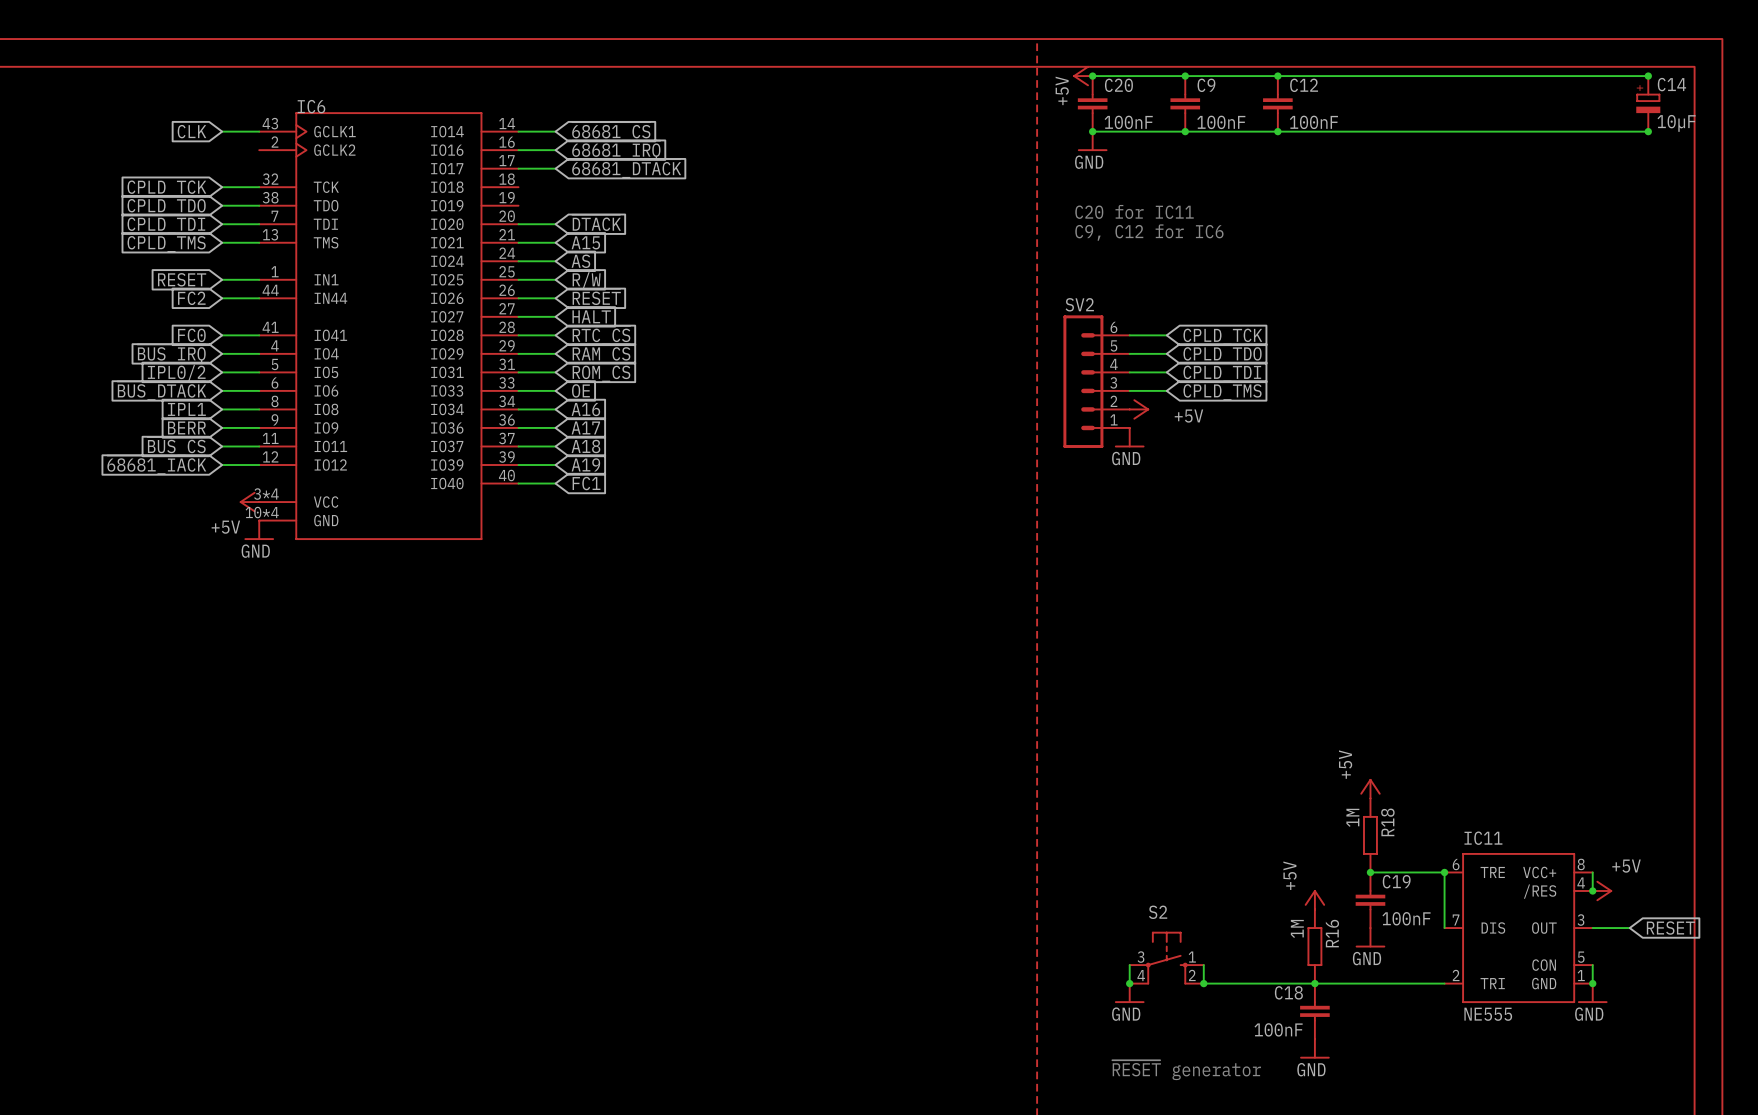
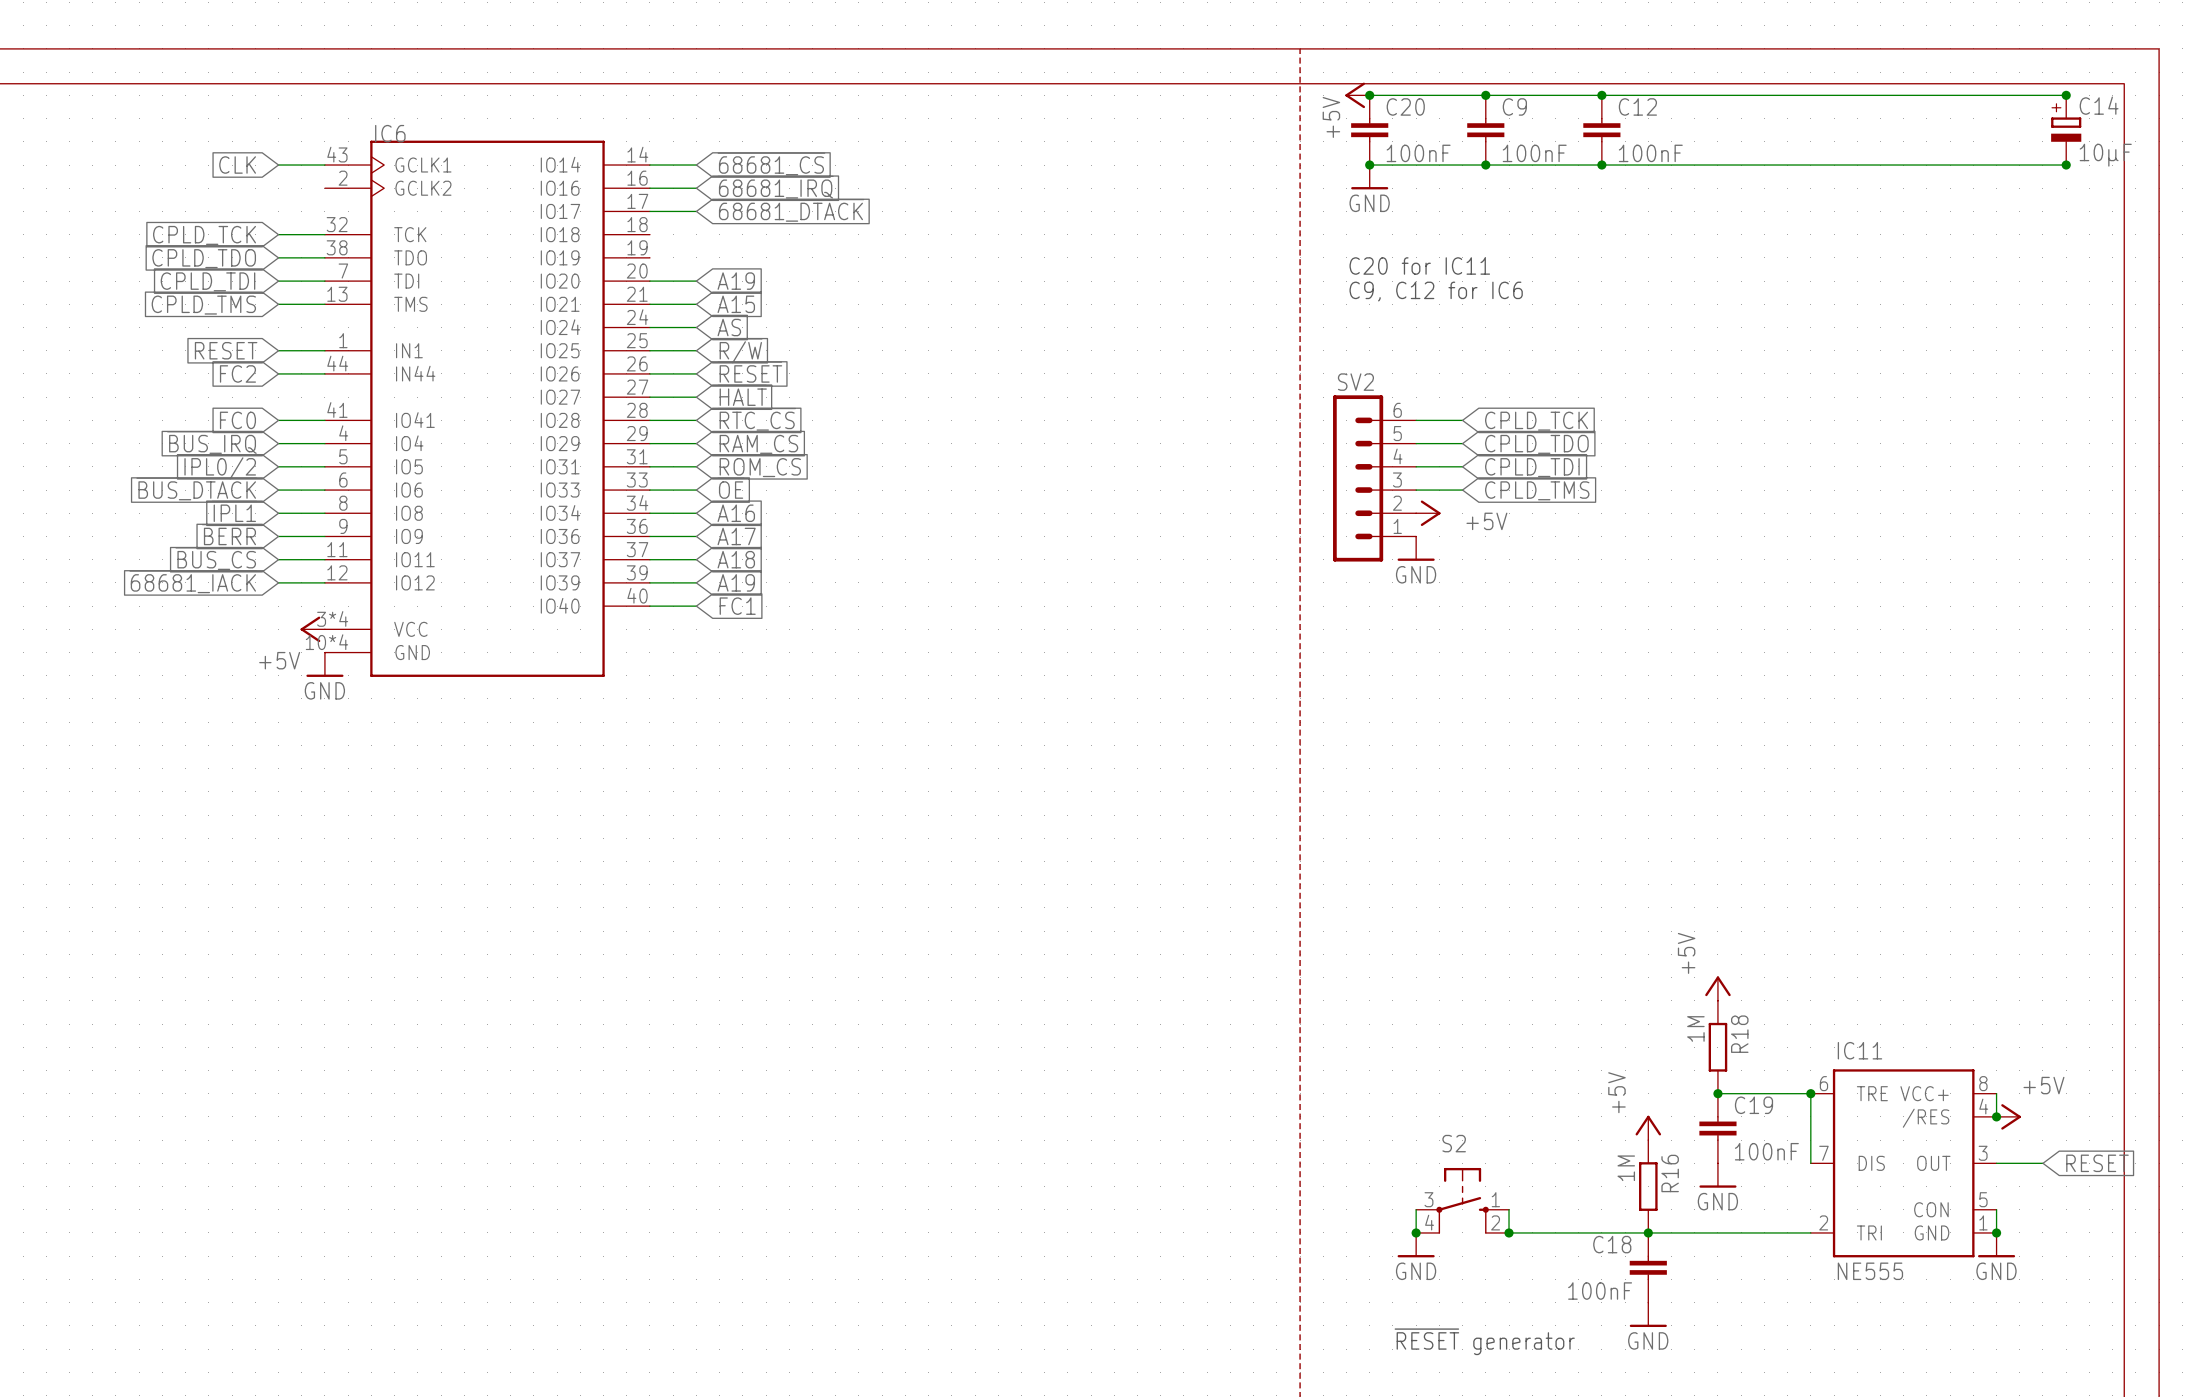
global label: ~{DTACK} (596, 222) -> A19 (736, 281)

